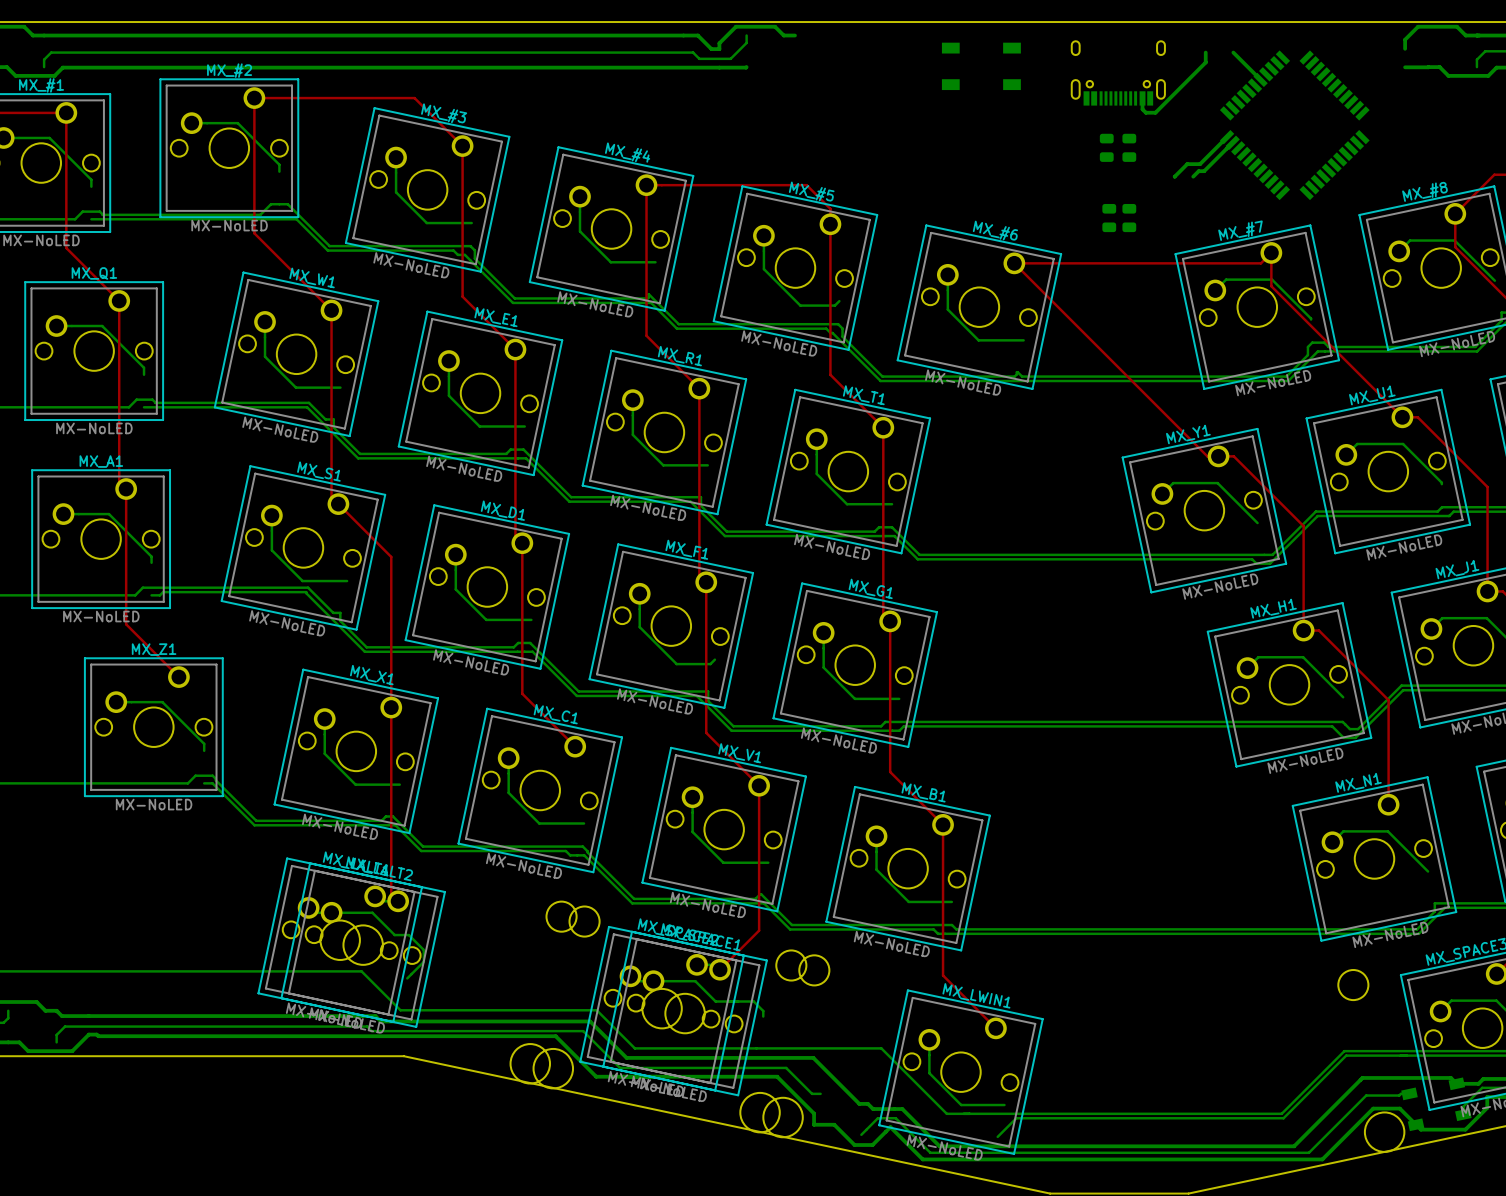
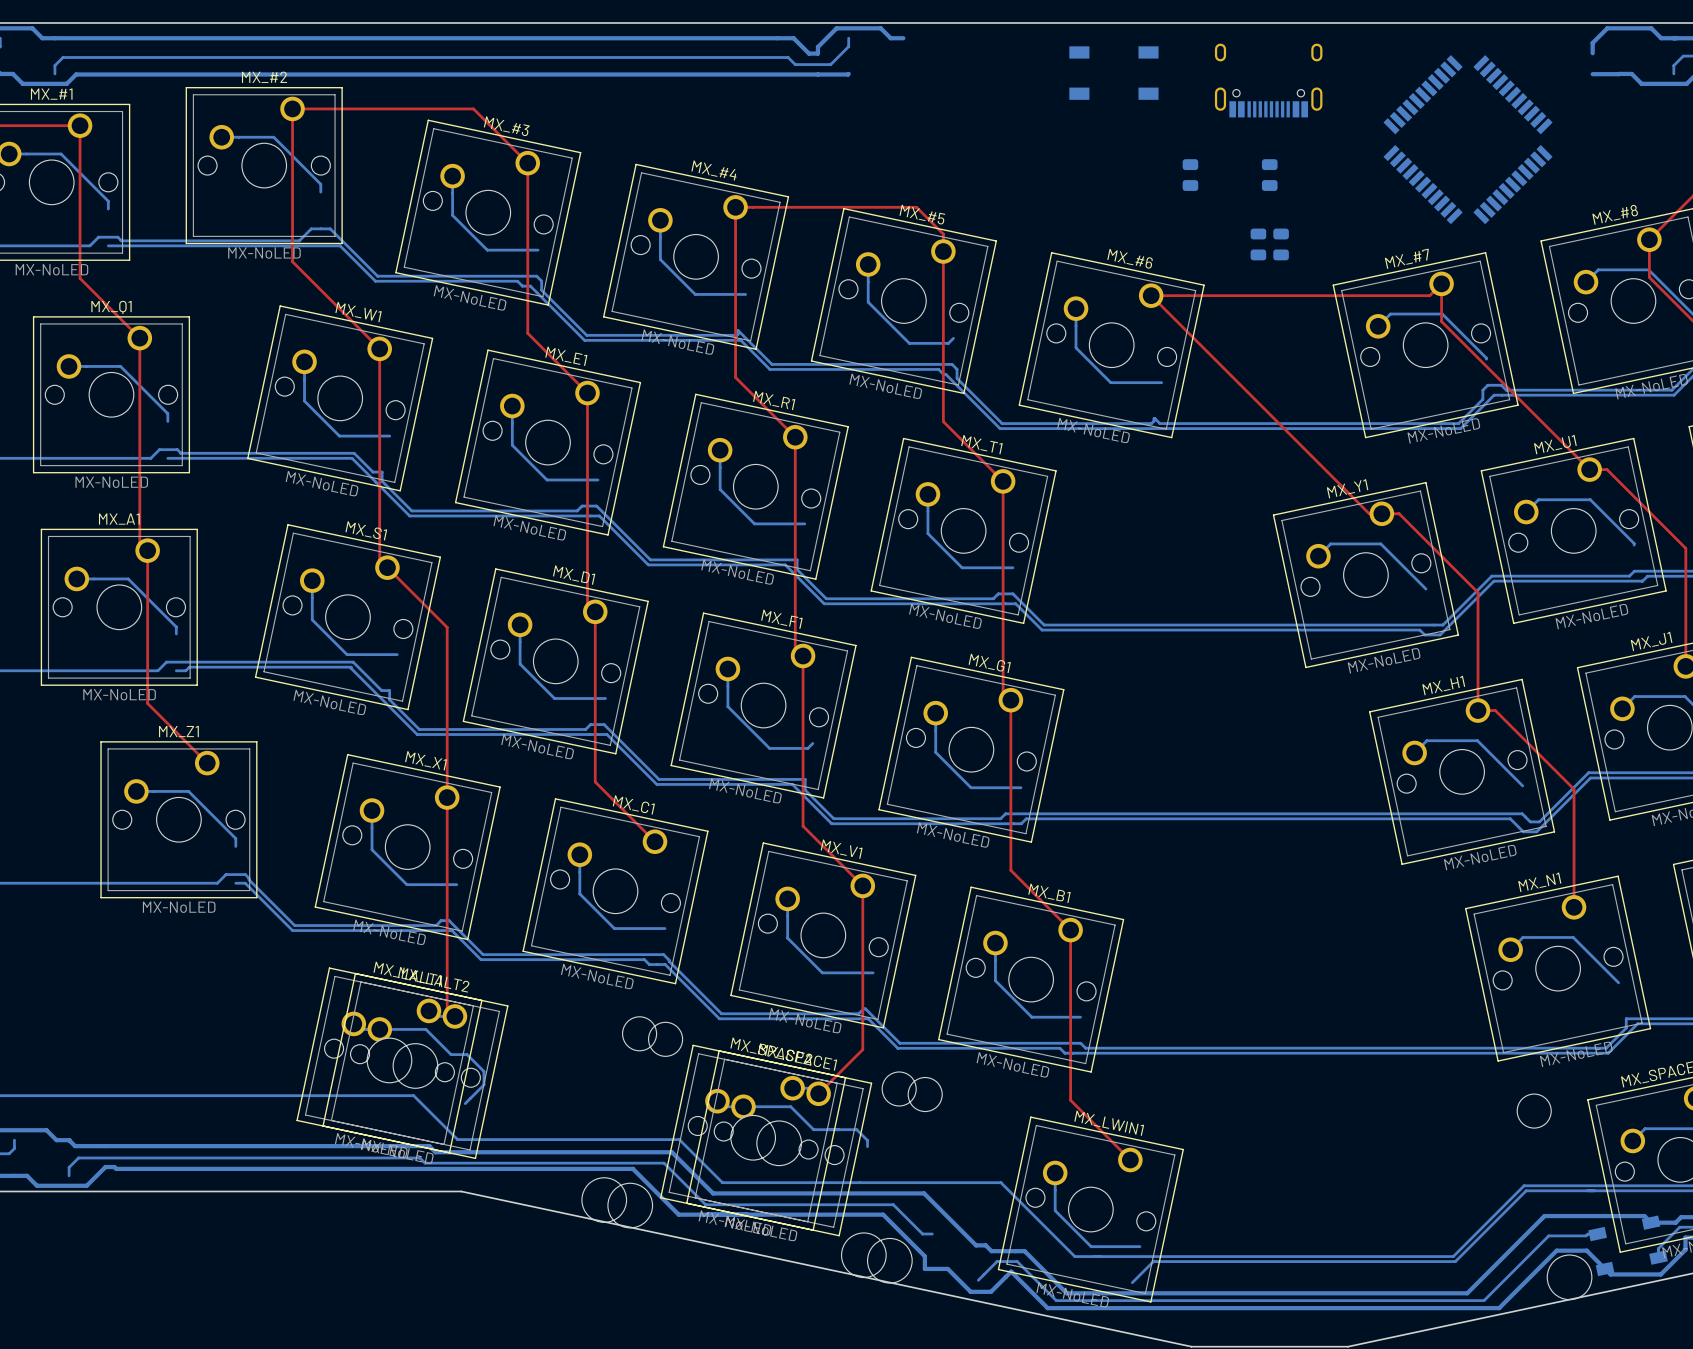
bottom track: (1205, 52) (1205, 62) (1155, 112) (1145, 112) (1142, 109) (1142, 98) -> none
bottom track: (1233, 52) (1260, 79) -> none
bottom track: (1227, 137) (1200, 164) (1187, 164) (1174, 176) -> none
bottom track: (1232, 142) (1204, 171) (1198, 171) (1193, 176) -> none
part: (1106, 147) -> none
part: (1129, 147) -> none
part: none -> (1190, 175)
part: none -> (1269, 175)

